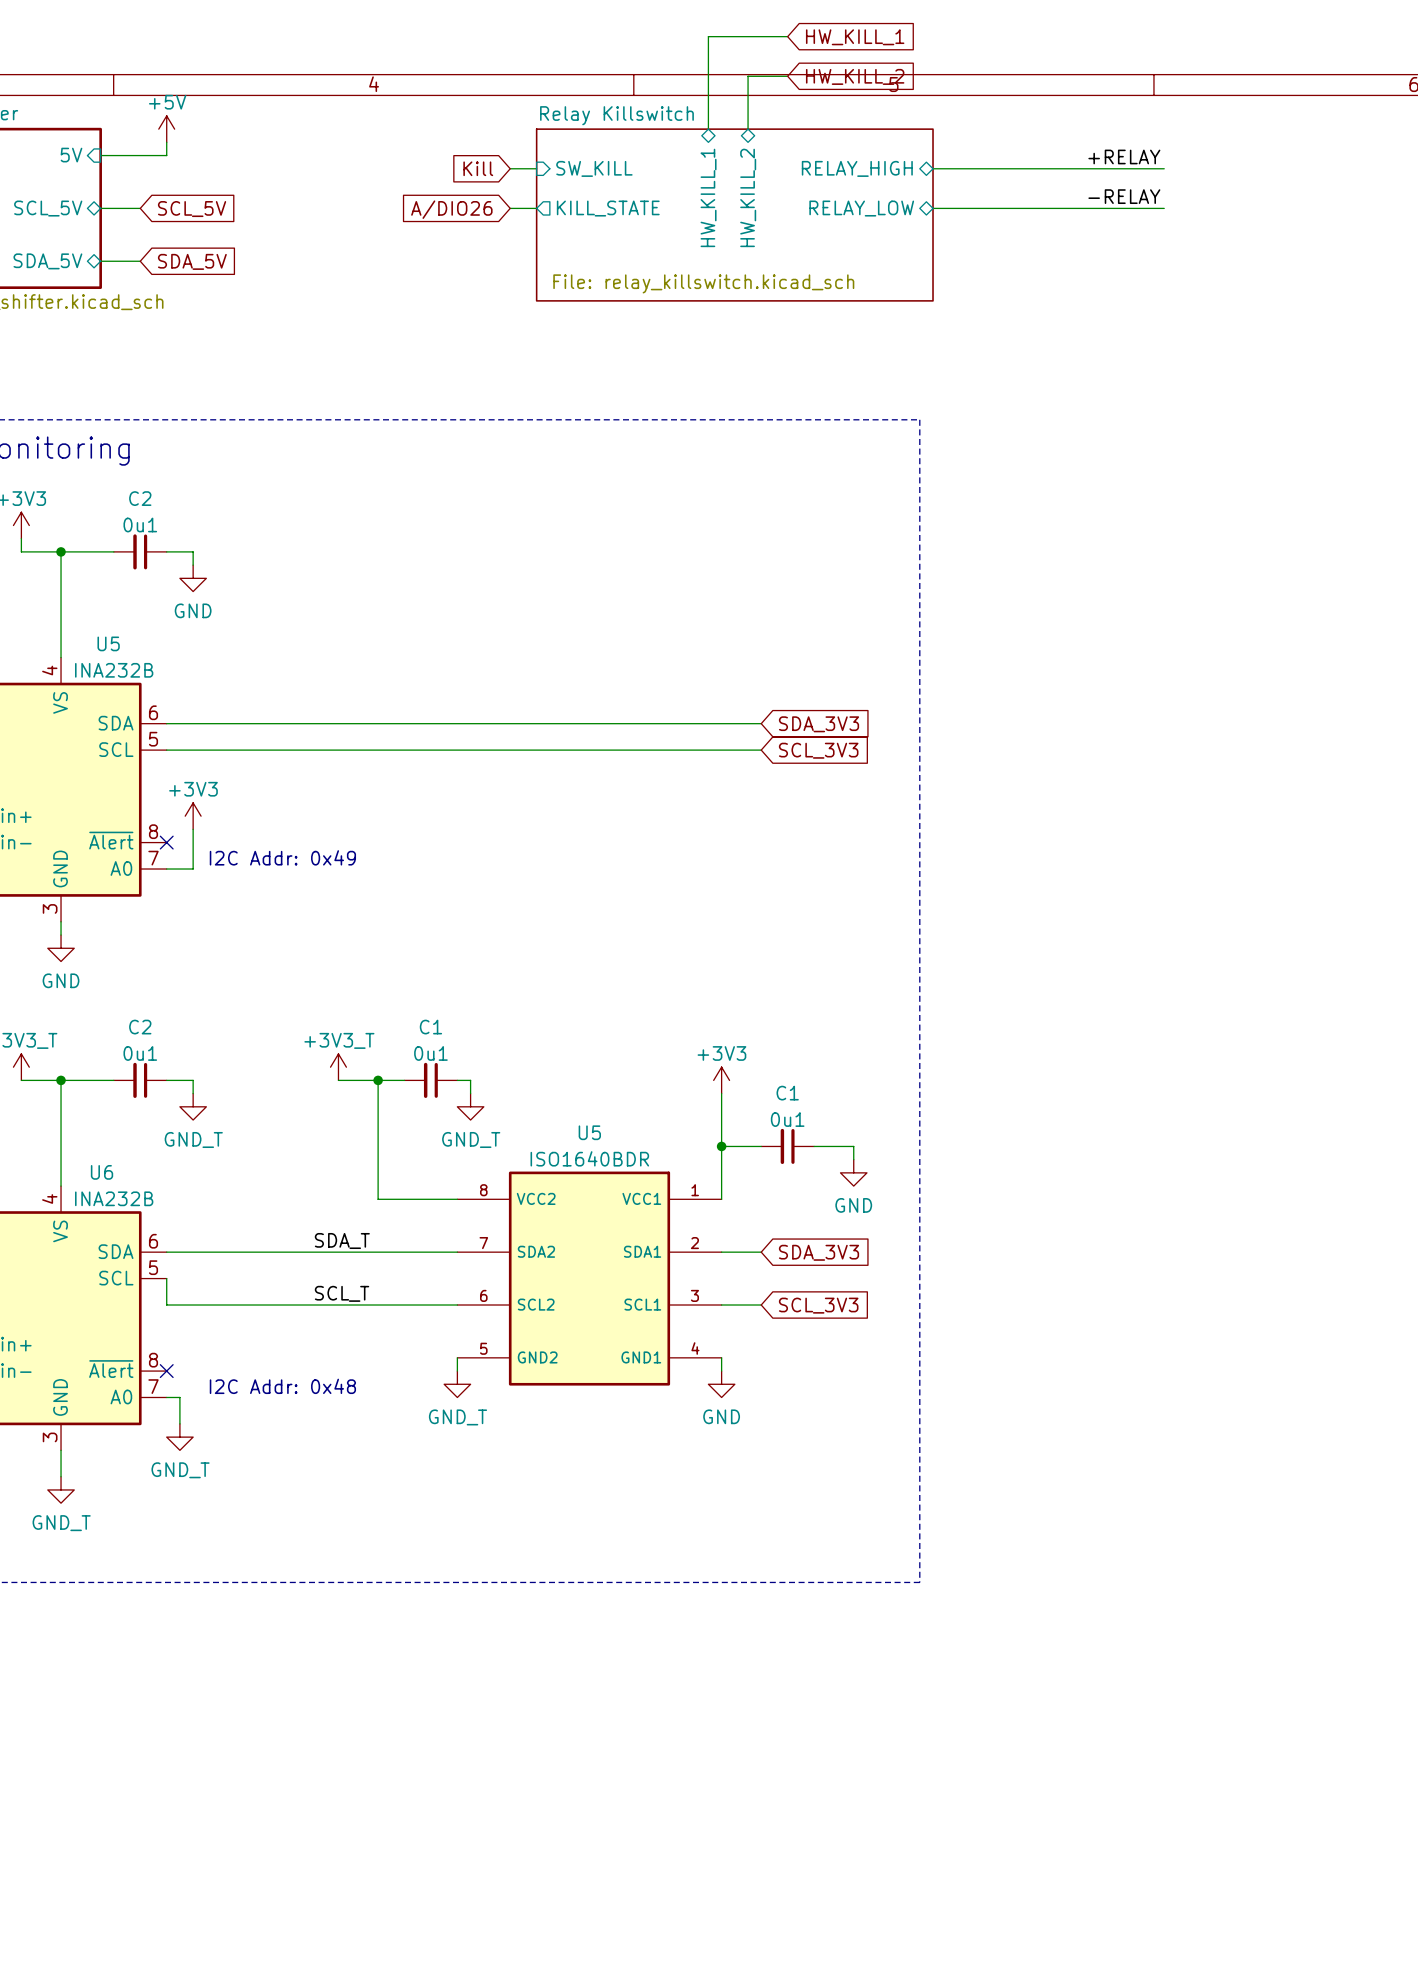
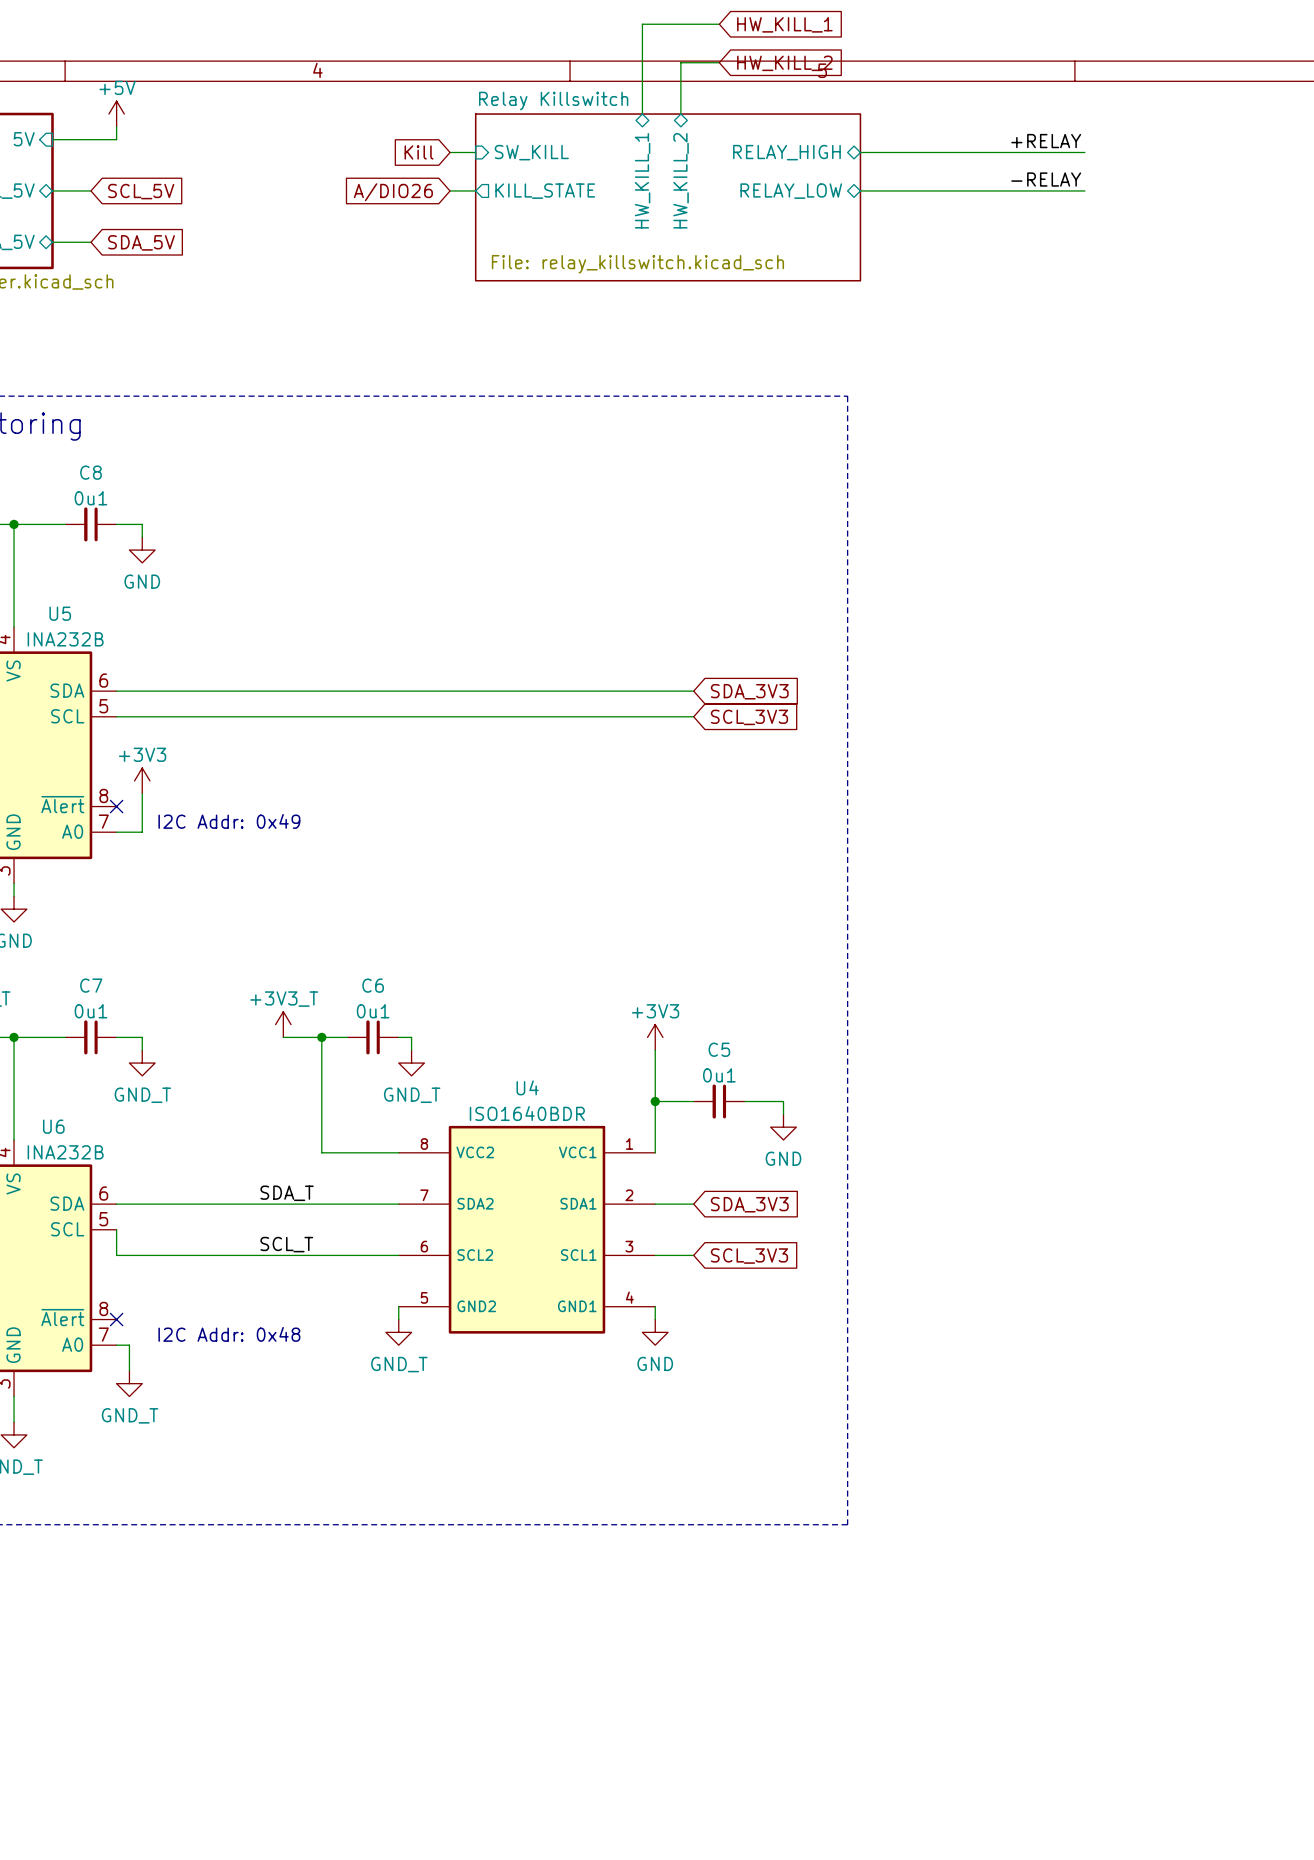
C2 name: C2 (140, 498) -> C8 (90, 472)
C2 name: C2 (140, 1027) -> C7 (91, 985)
C1 name: C1 (430, 1027) -> C6 (373, 985)
C1 name: C1 (787, 1093) -> C5 (719, 1049)
U5 name: U5 (589, 1132) -> U4 (527, 1087)

